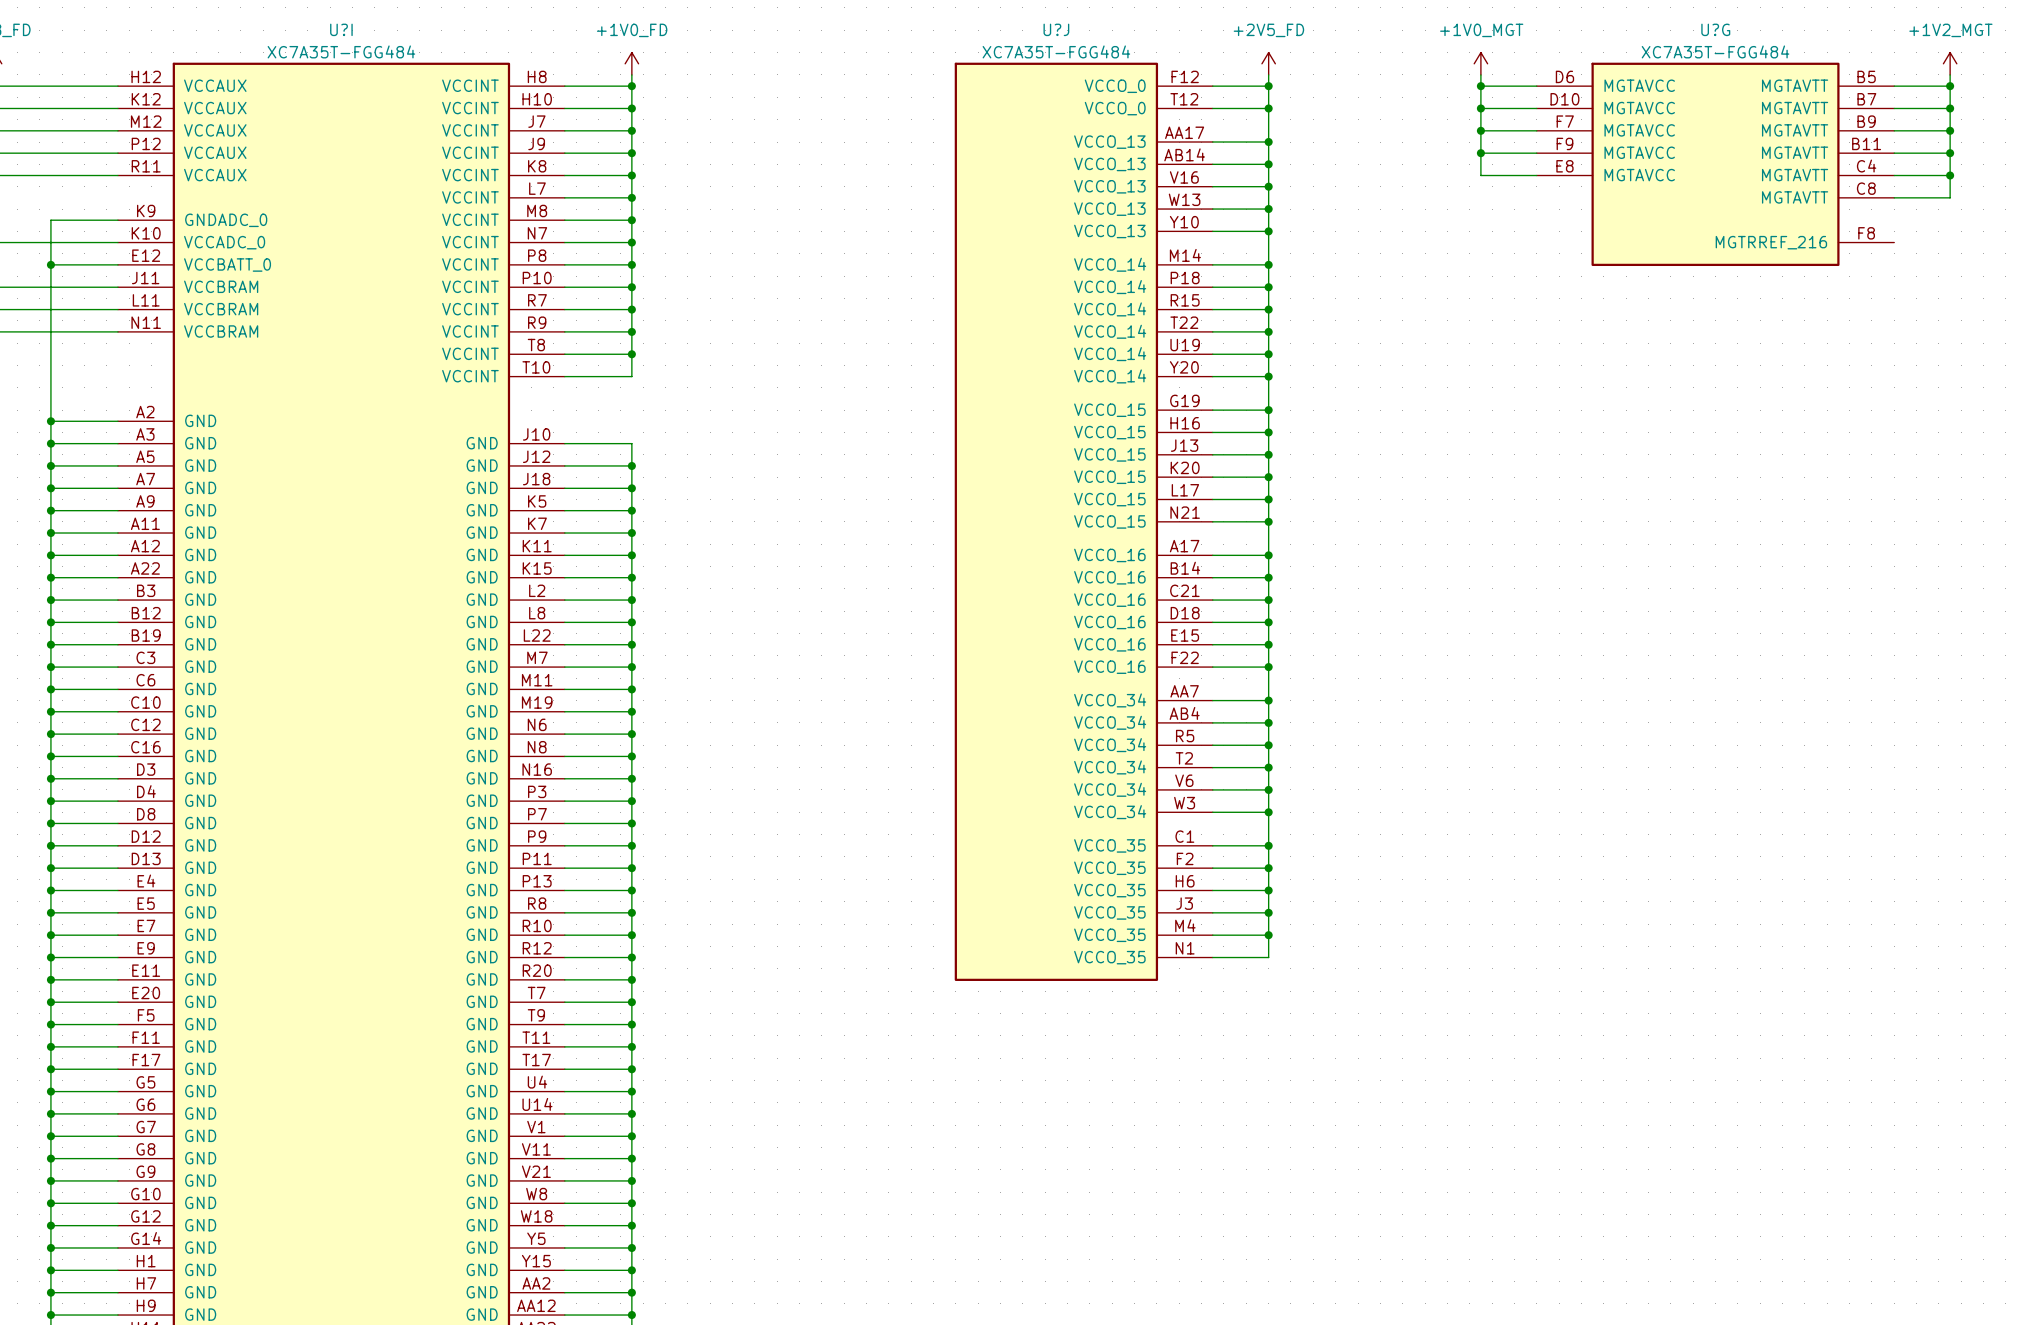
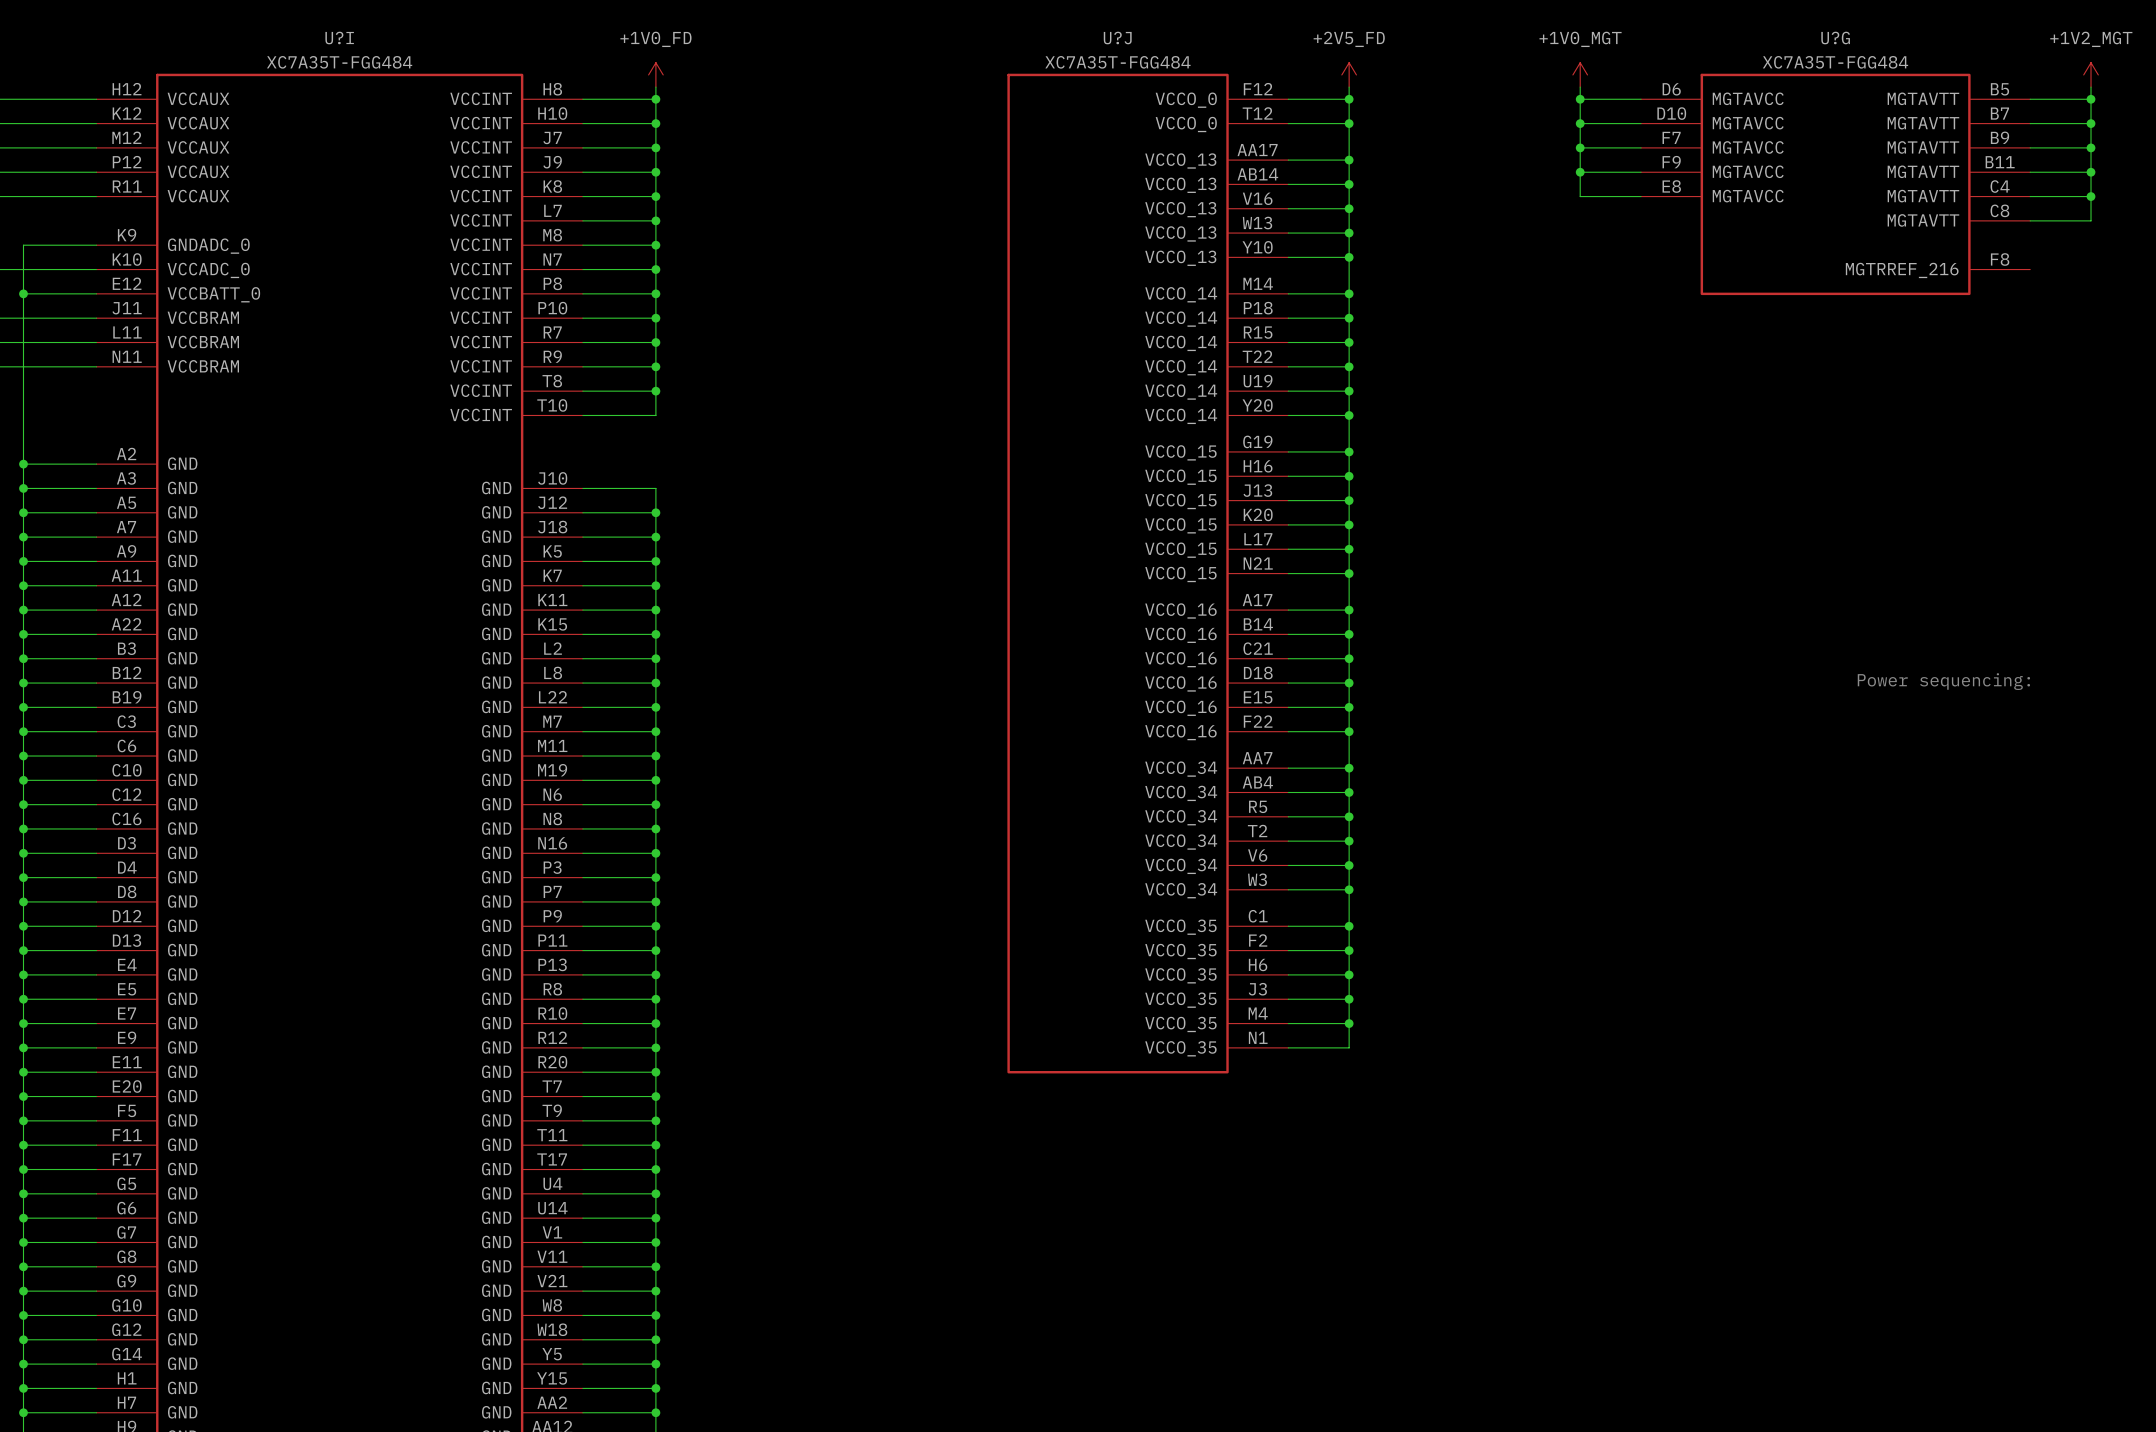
text: none -> Power sequencing: (1943, 681)

